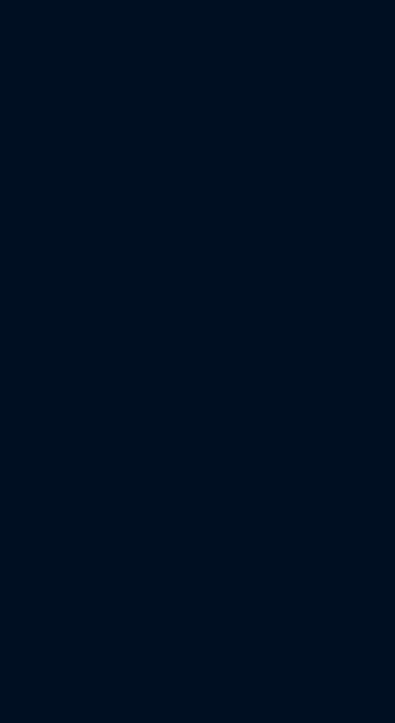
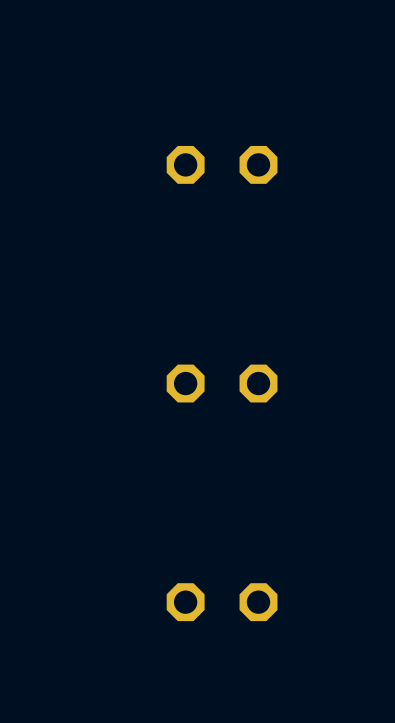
part: none -> (222, 164)
part: none -> (222, 383)
part: none -> (222, 602)

